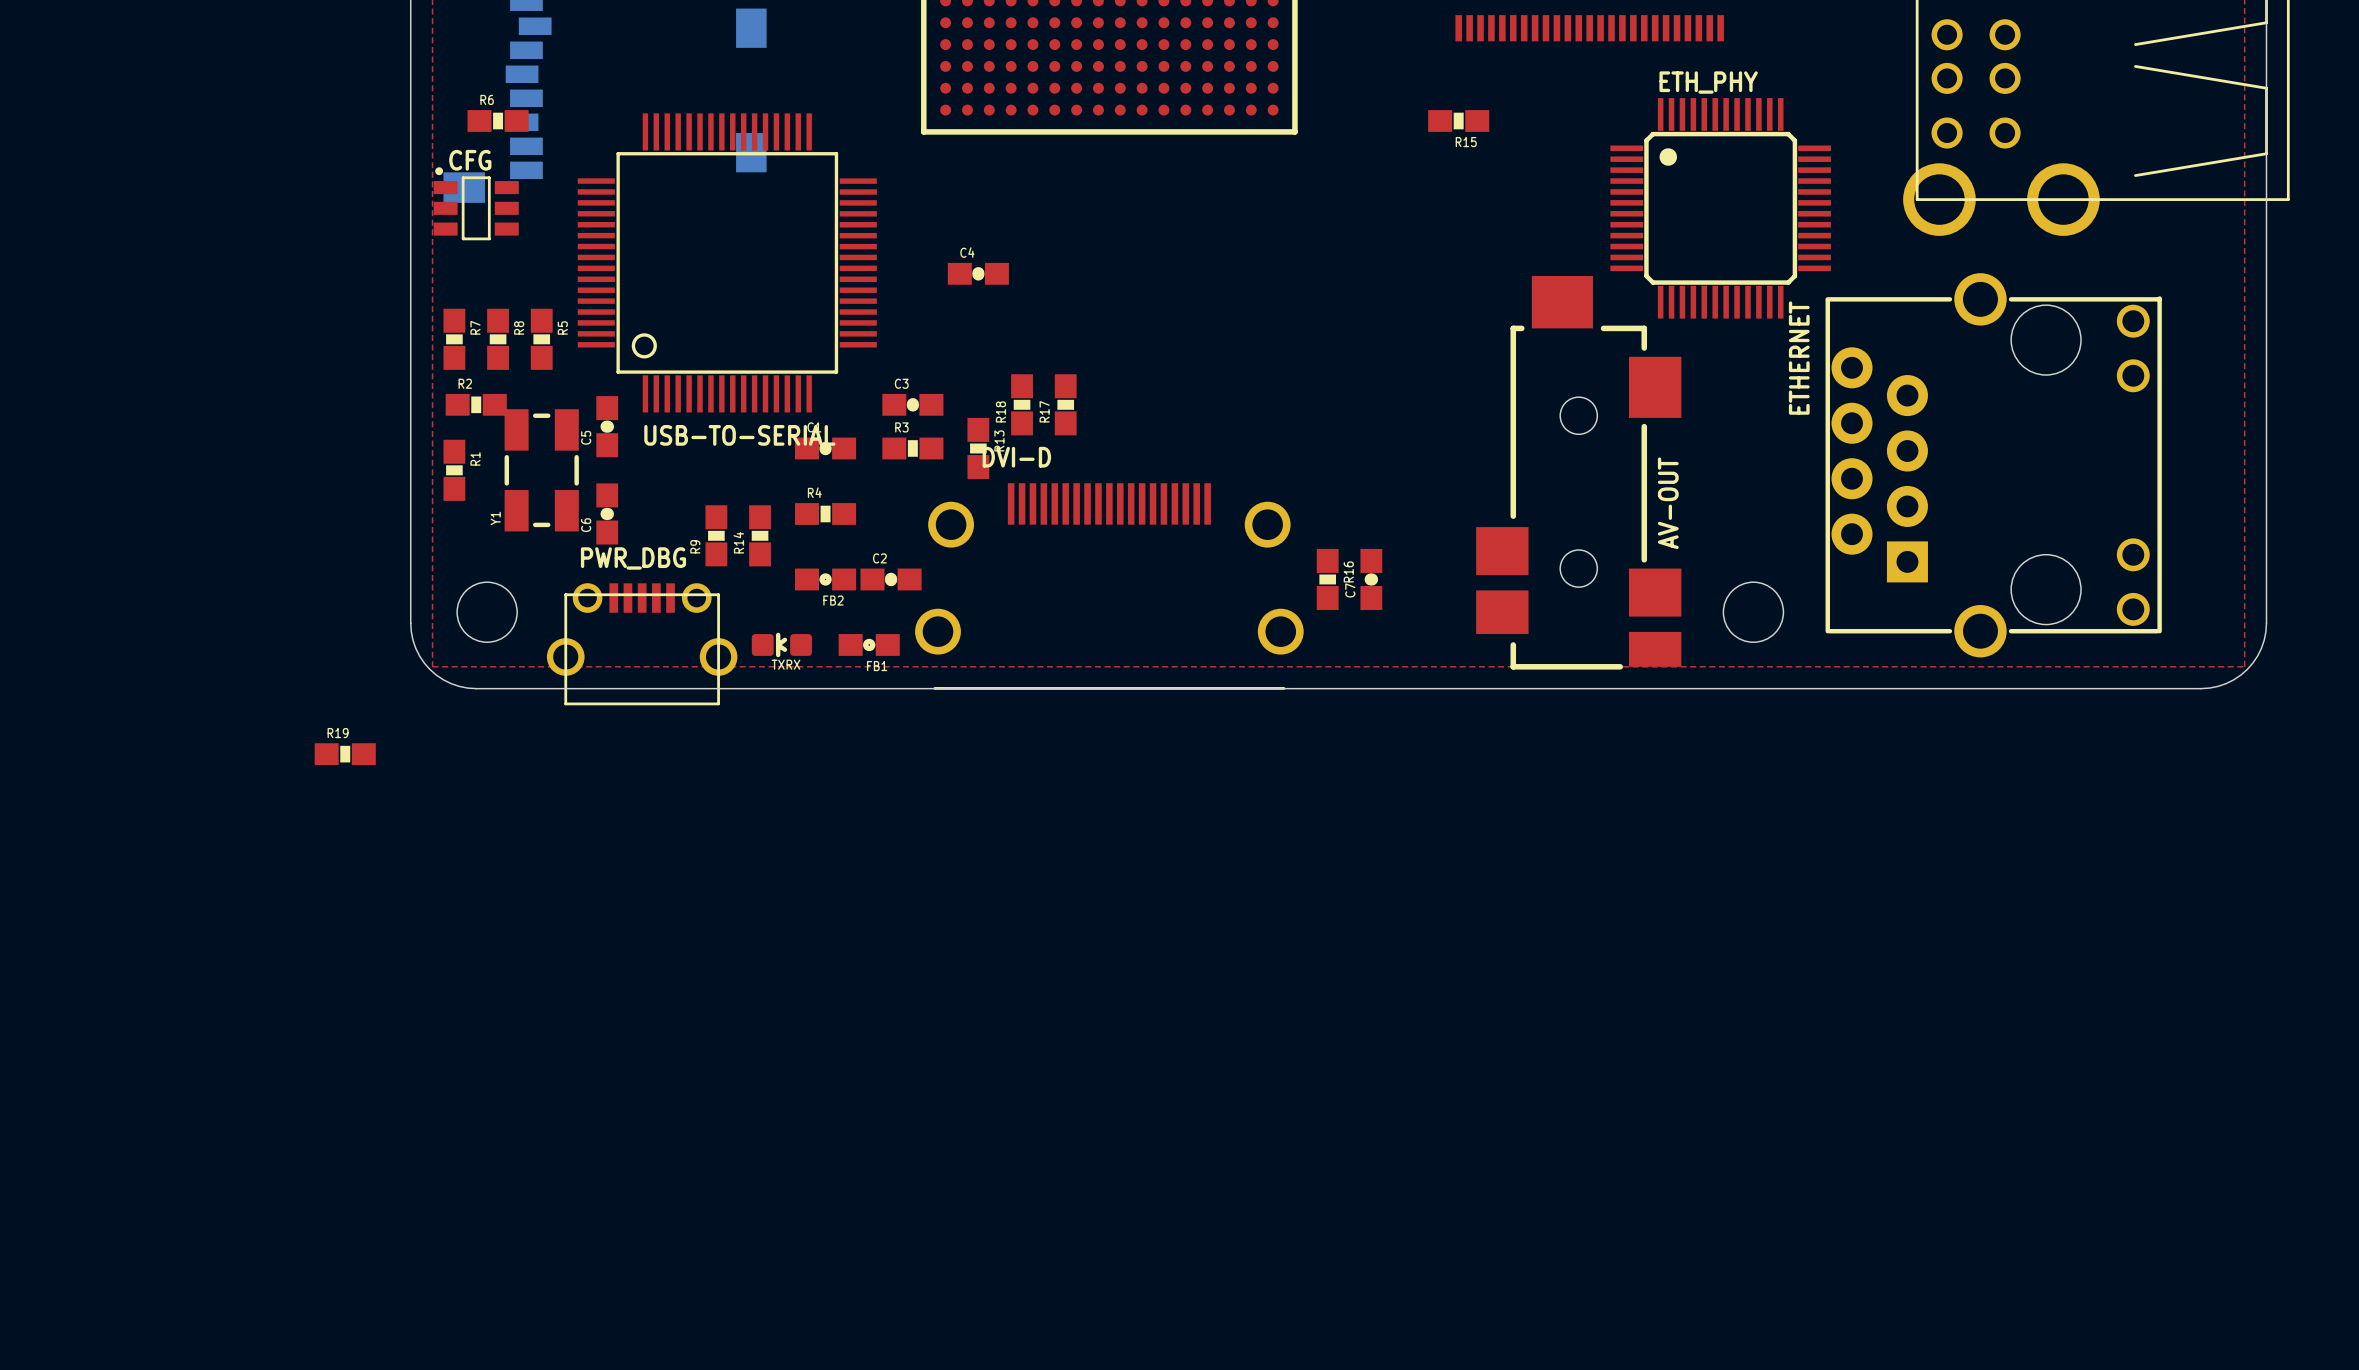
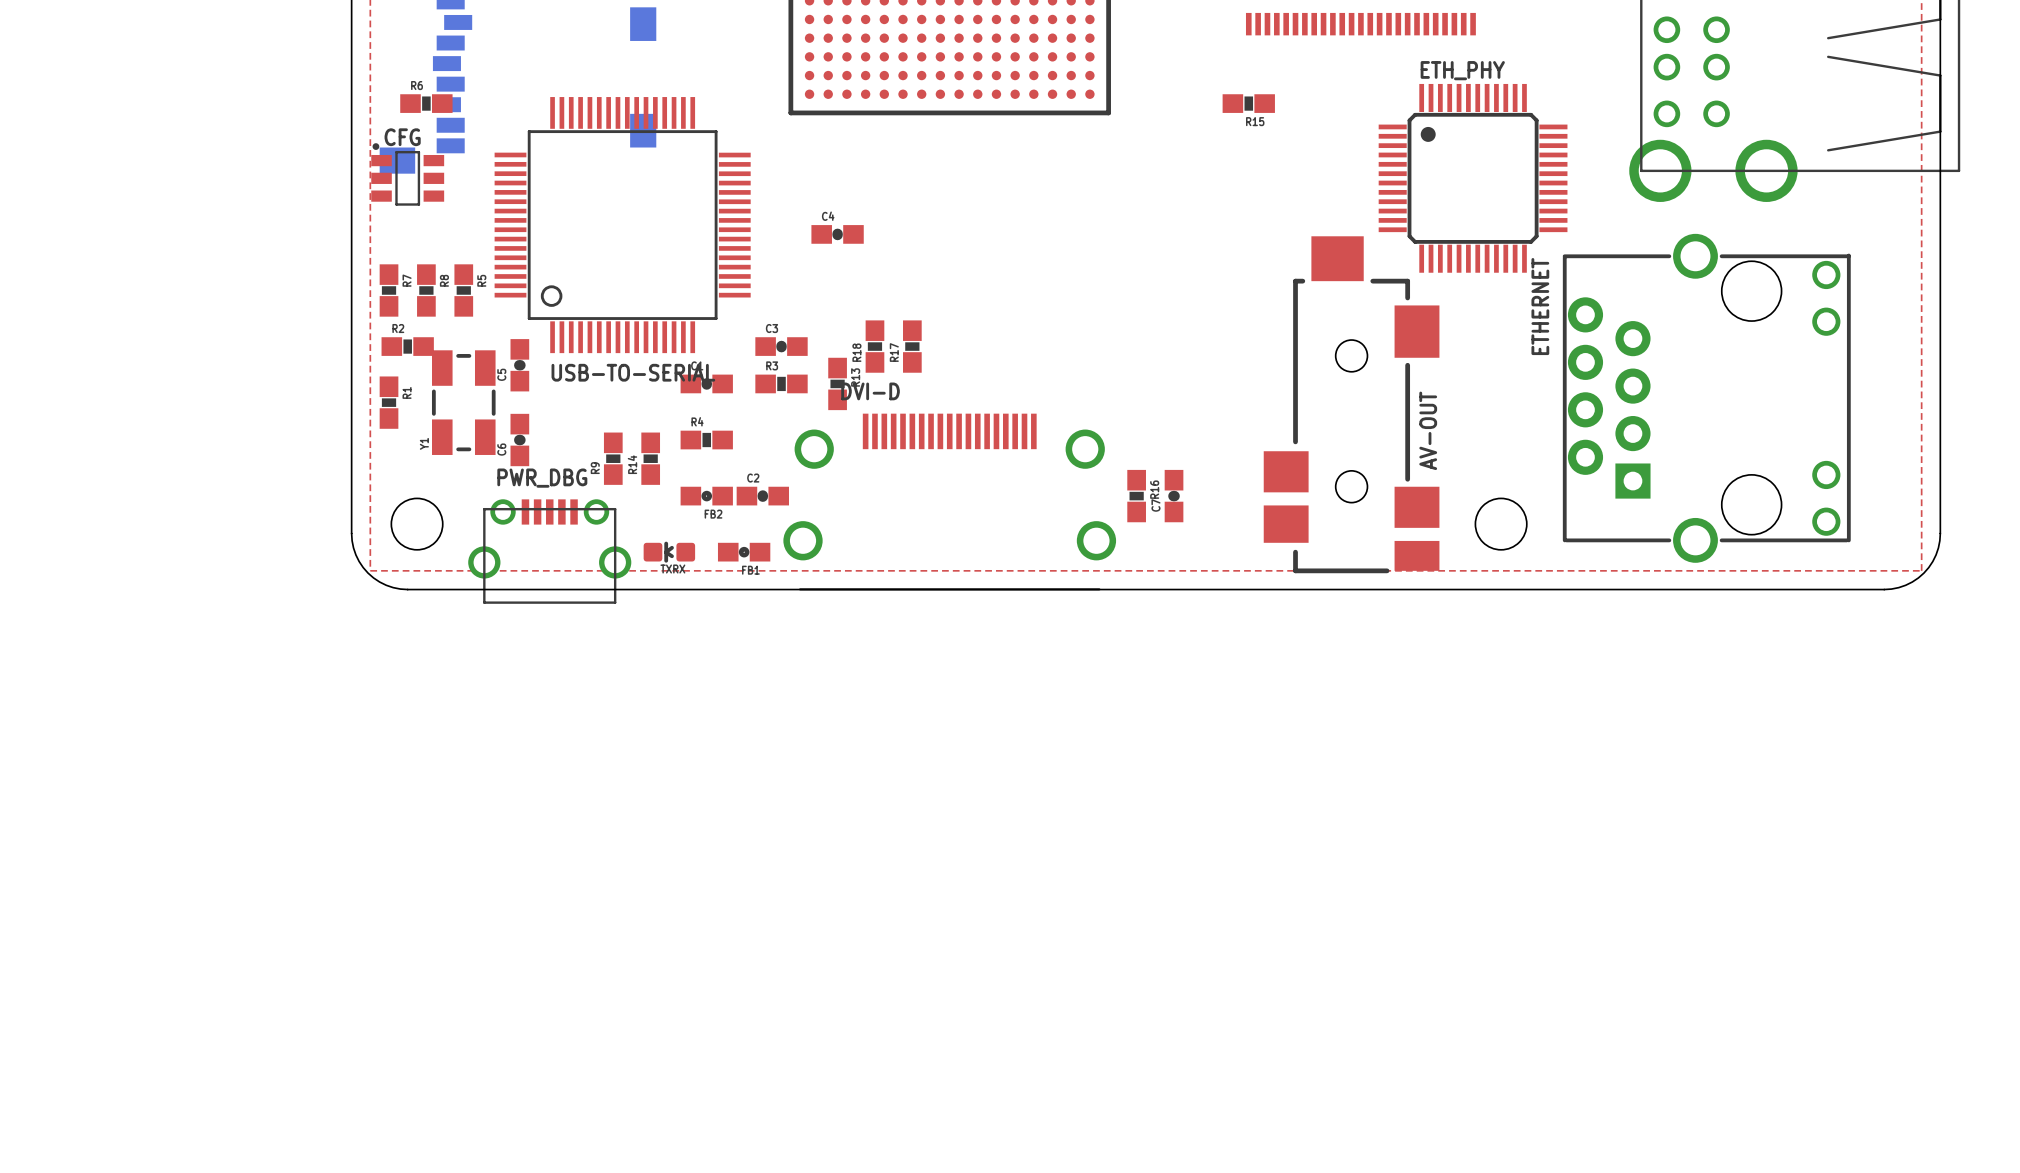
R19: (345, 754) -> none

